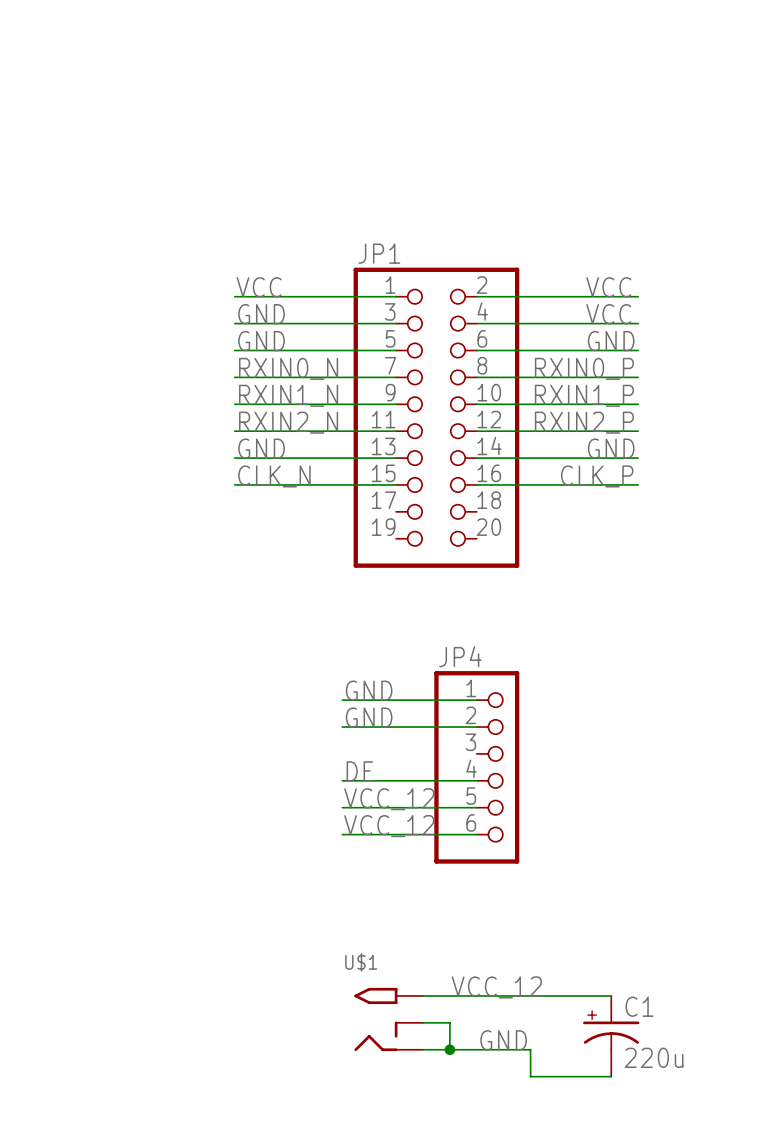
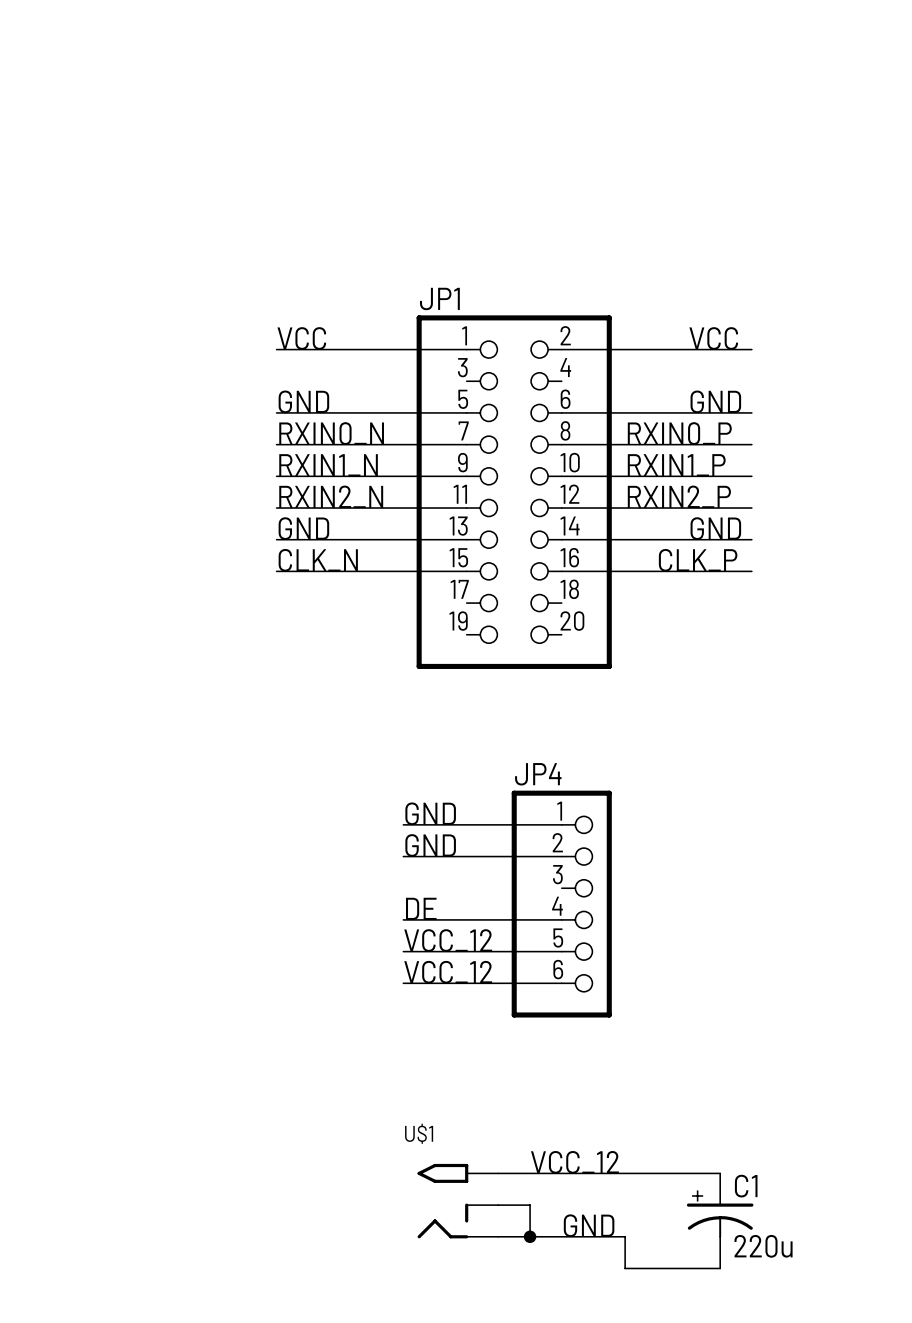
label: GND (261, 314) -> none
label: VCC (608, 314) -> none
wire: (234, 323) (396, 323) -> none
wire: (476, 323) (638, 323) -> none

